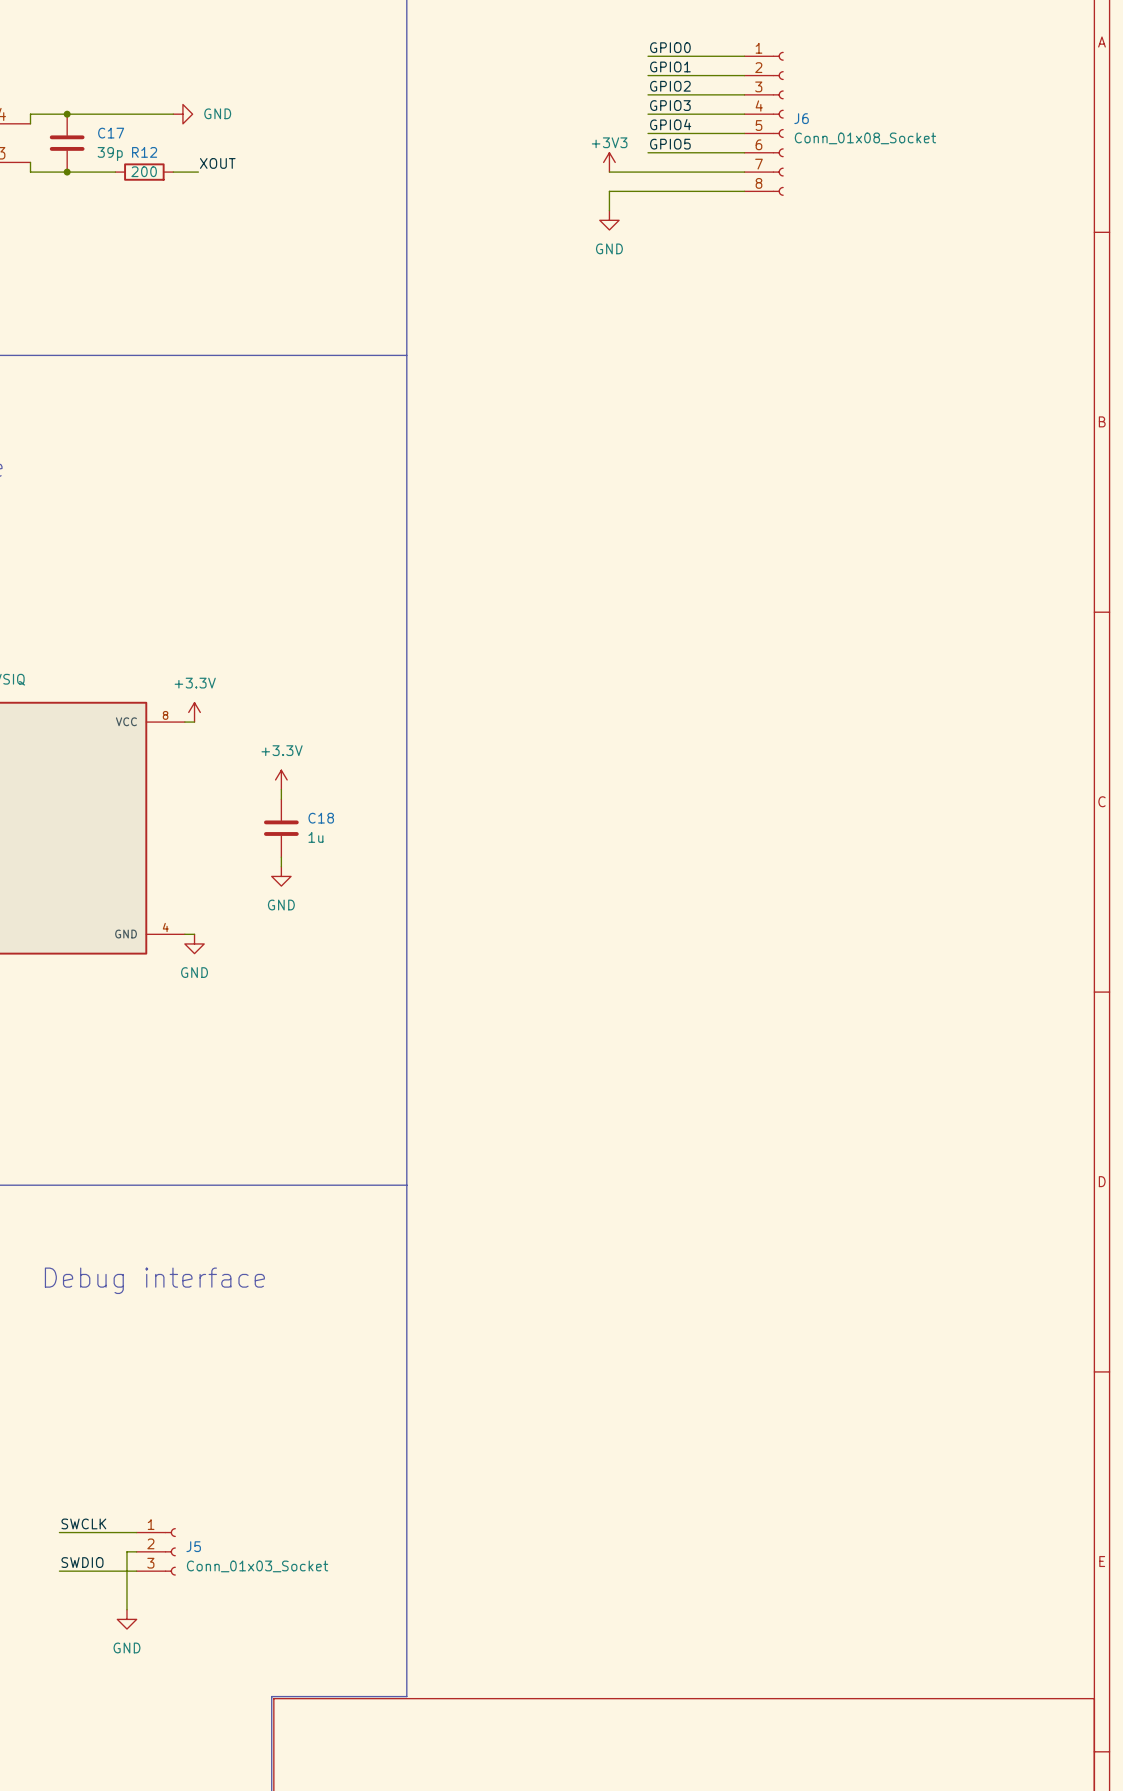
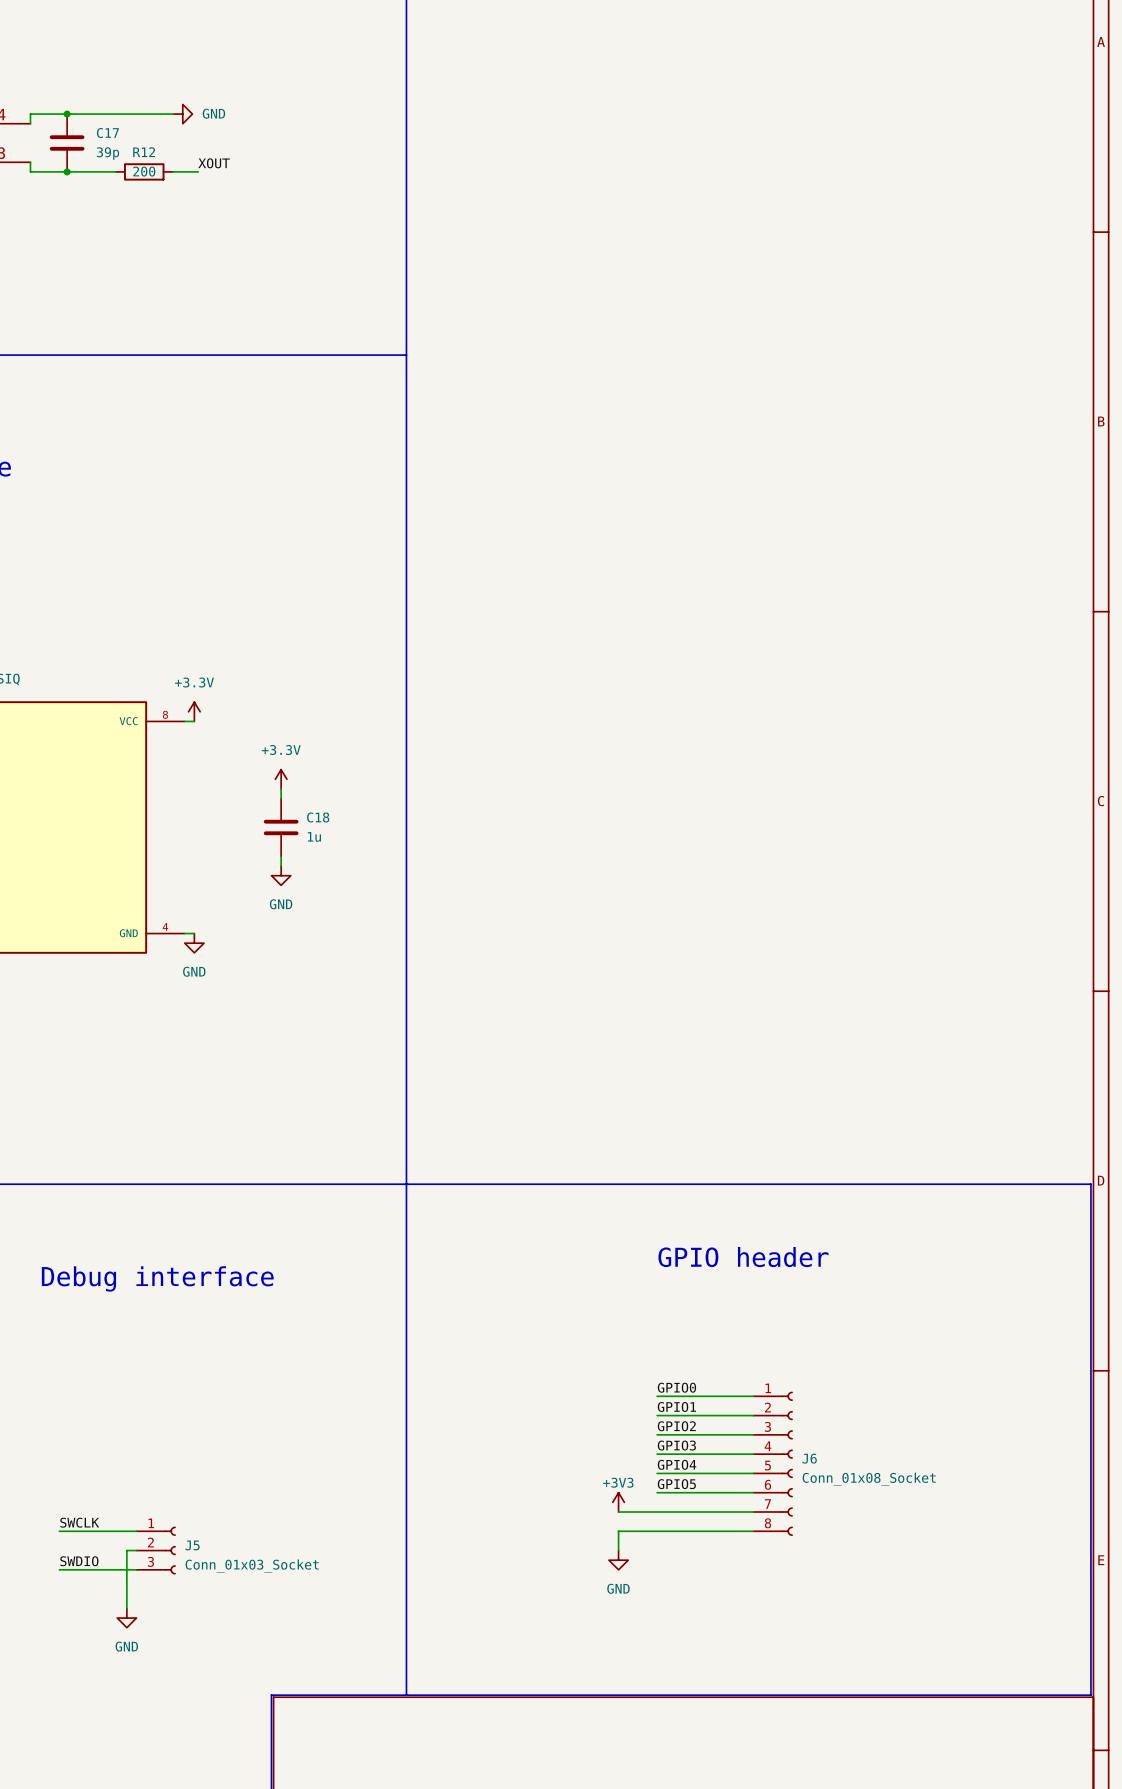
label: GPIO0 (670, 47) -> none
wire: (648, 56) (744, 56) -> none
label: GPIO1 (670, 66) -> none
wire: (648, 75) (744, 75) -> none
label: GPIO2 (670, 86) -> none
wire: (648, 94) (744, 94) -> none
label: GPIO3 (670, 105) -> none
wire: (648, 114) (744, 114) -> none
J6 position: (764, 123) -> (773, 1463)
label: GPIO4 (670, 124) -> none
wire: (648, 133) (744, 133) -> none
label: GPIO5 (670, 144) -> none
wire: (648, 152) (744, 152) -> none
power symbol: +3V3 (609, 162) -> none
wire: (609, 172) (744, 172) -> none
wire: (744, 191) (609, 191) (609, 210) -> none
power symbol: GND (609, 220) -> none
line: none -> (406, 1184) (1090, 1184) (1090, 1695) (406, 1695)
text: none -> GPIO header (743, 1257)
label: none -> GPIO0 (676, 1387)
wire: none -> (657, 1396) (753, 1396)
label: none -> GPIO1 (676, 1406)
wire: none -> (657, 1415) (753, 1415)
label: none -> GPIO2 (676, 1426)
wire: none -> (657, 1434) (753, 1434)
label: none -> GPIO3 (676, 1445)
wire: none -> (657, 1454) (753, 1454)
label: none -> GPIO4 (677, 1464)
wire: none -> (657, 1473) (753, 1473)
label: none -> GPIO5 (676, 1484)
wire: none -> (657, 1492) (753, 1492)
power symbol: none -> +3V3 (618, 1502)
wire: none -> (618, 1511) (753, 1511)
wire: none -> (753, 1531) (618, 1531) (618, 1550)
power symbol: none -> GND (618, 1560)

